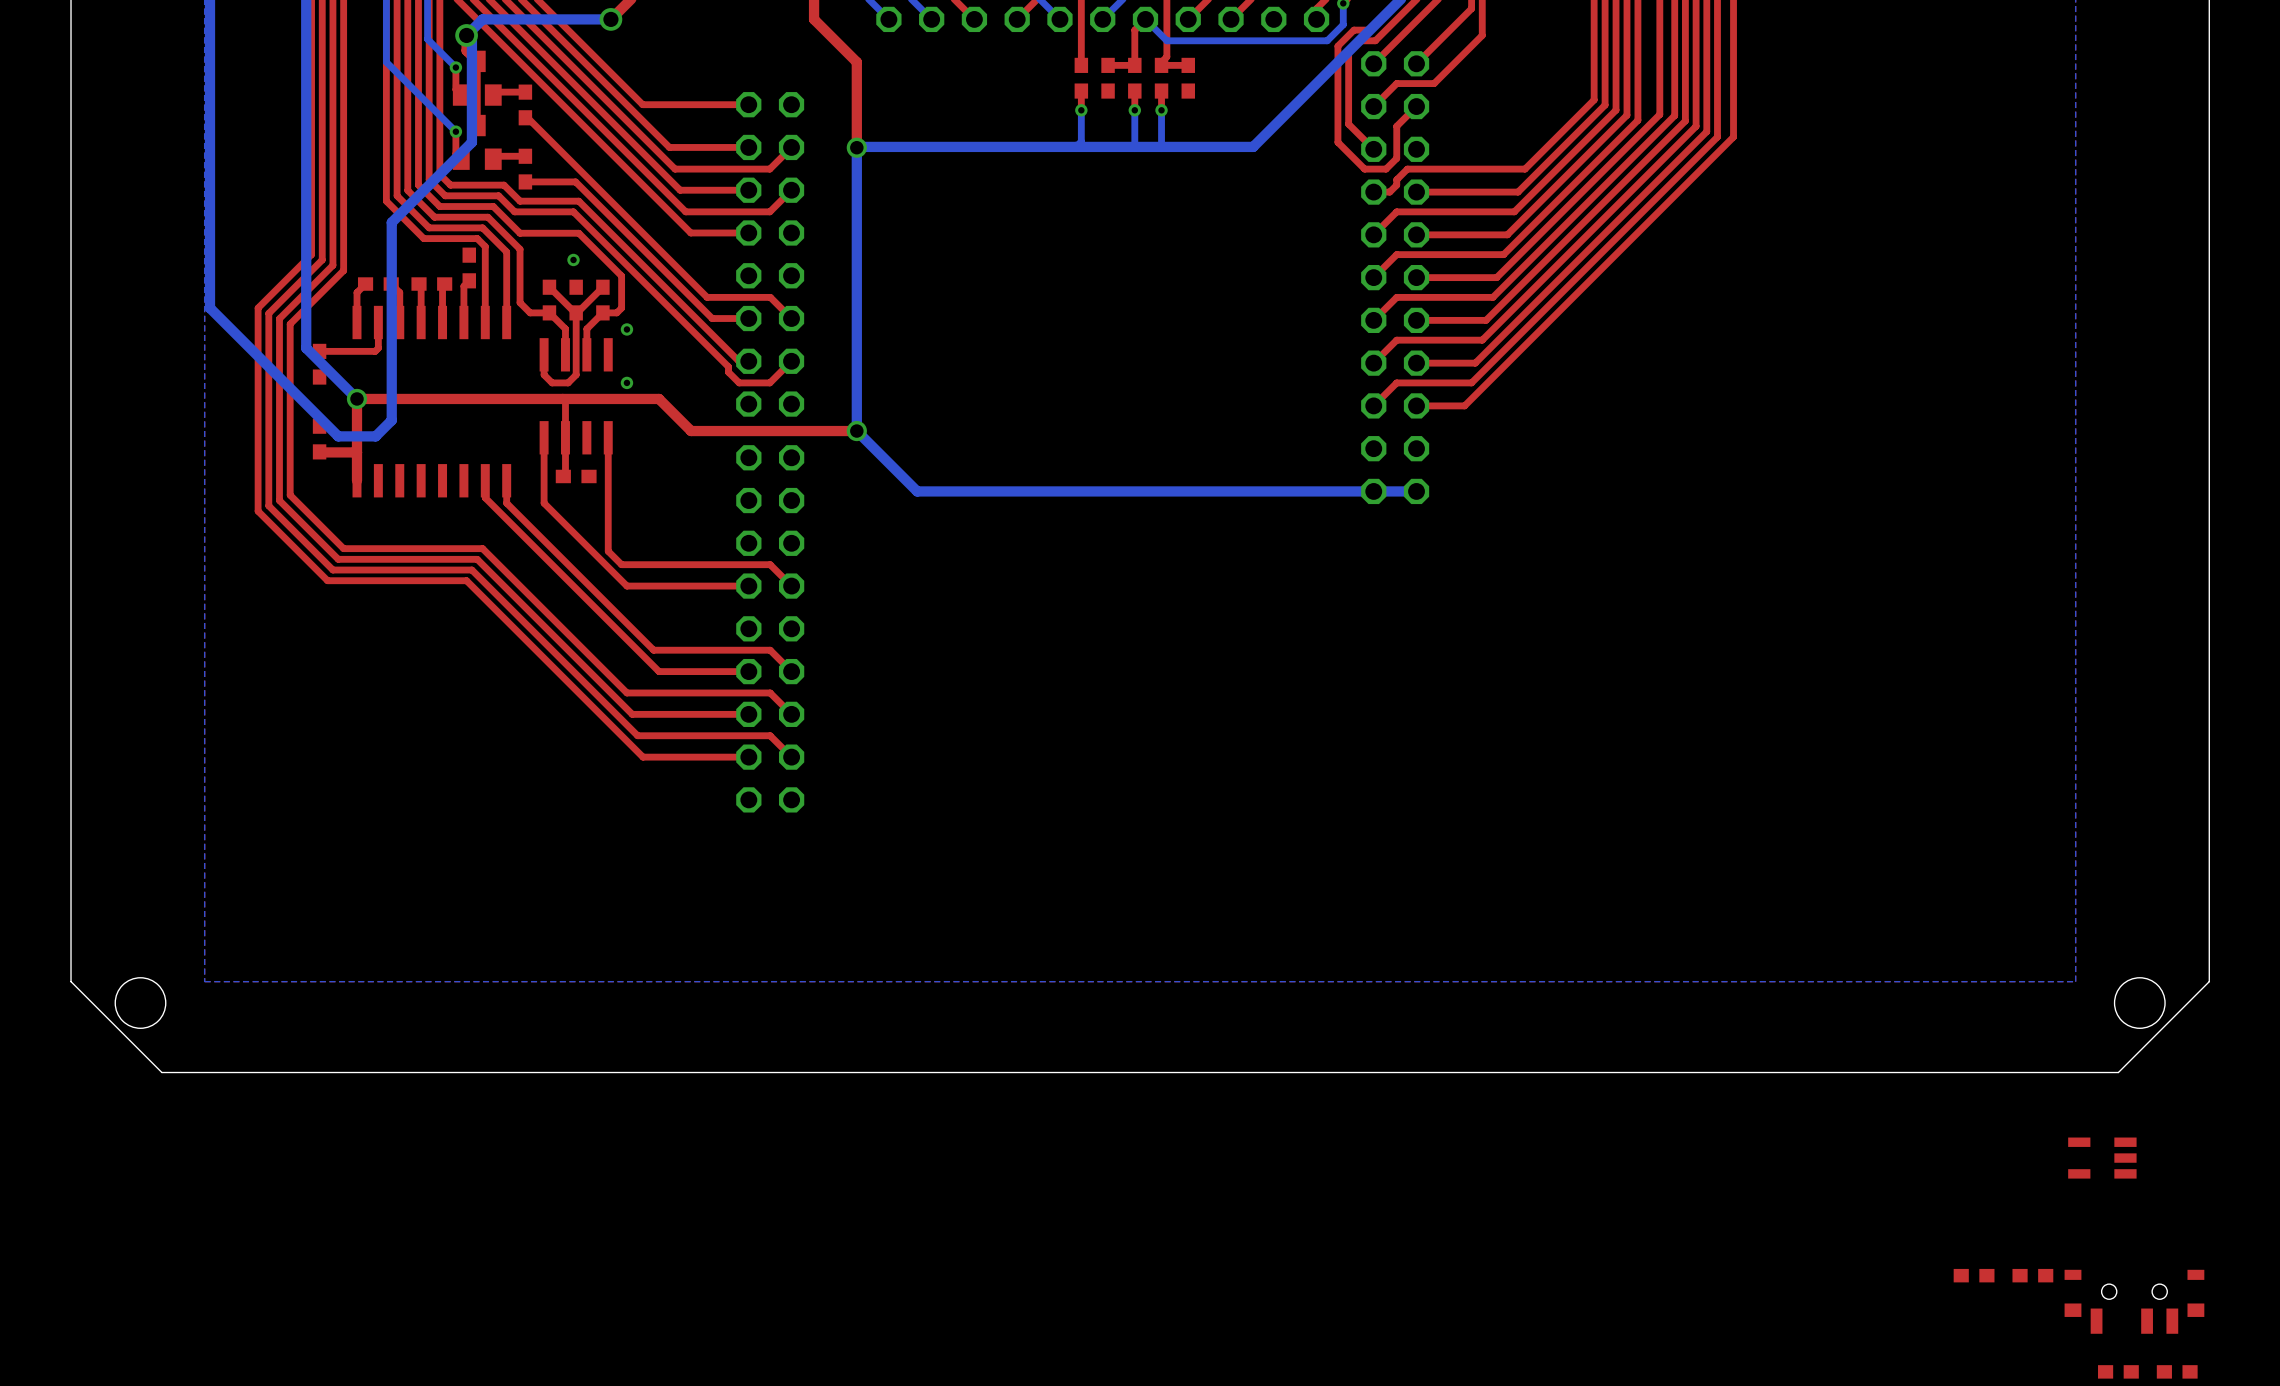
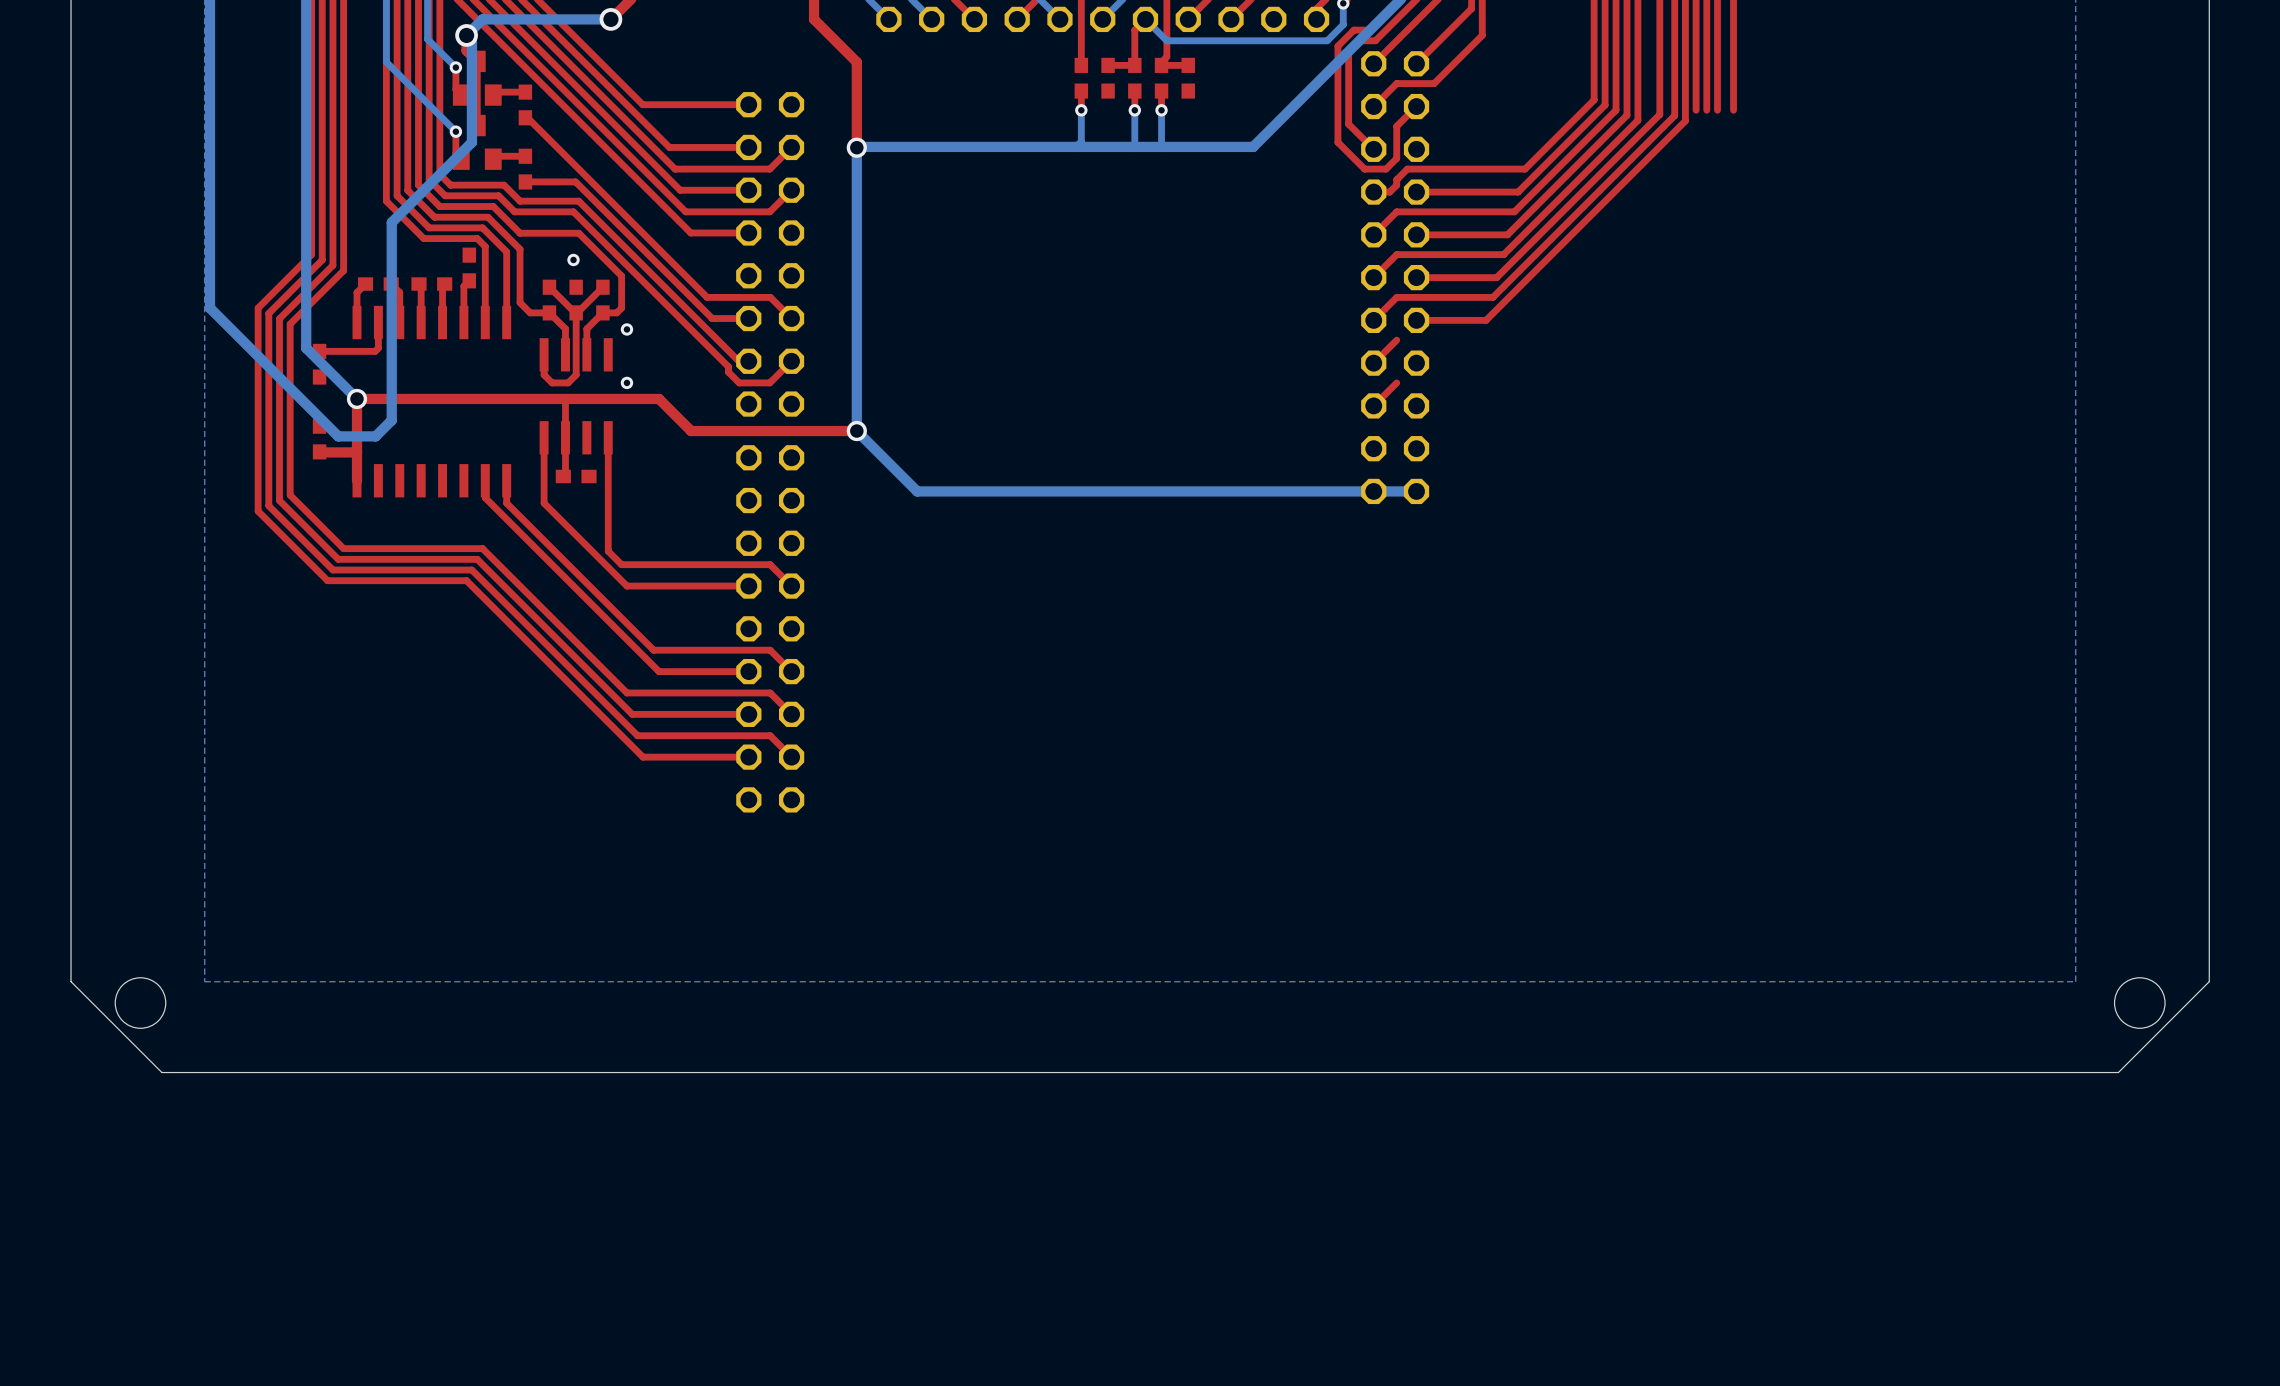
top track: (1696, 110) (1696, 126) (1482, 340) (1396, 340) -> none
top track: (1706, 110) (1706, 131) (1475, 363) (1416, 363) -> none
top track: (1717, 110) (1717, 137) (1471, 382) (1396, 382) -> none
top track: (1733, 110) (1733, 137) (1464, 405) (1416, 405) -> none
part: (2102, 1158) -> none
part: (1974, 1275) -> none
part: (2032, 1275) -> none
part: (2134, 1301) -> none
part: (2118, 1371) -> none
part: (2177, 1371) -> none

